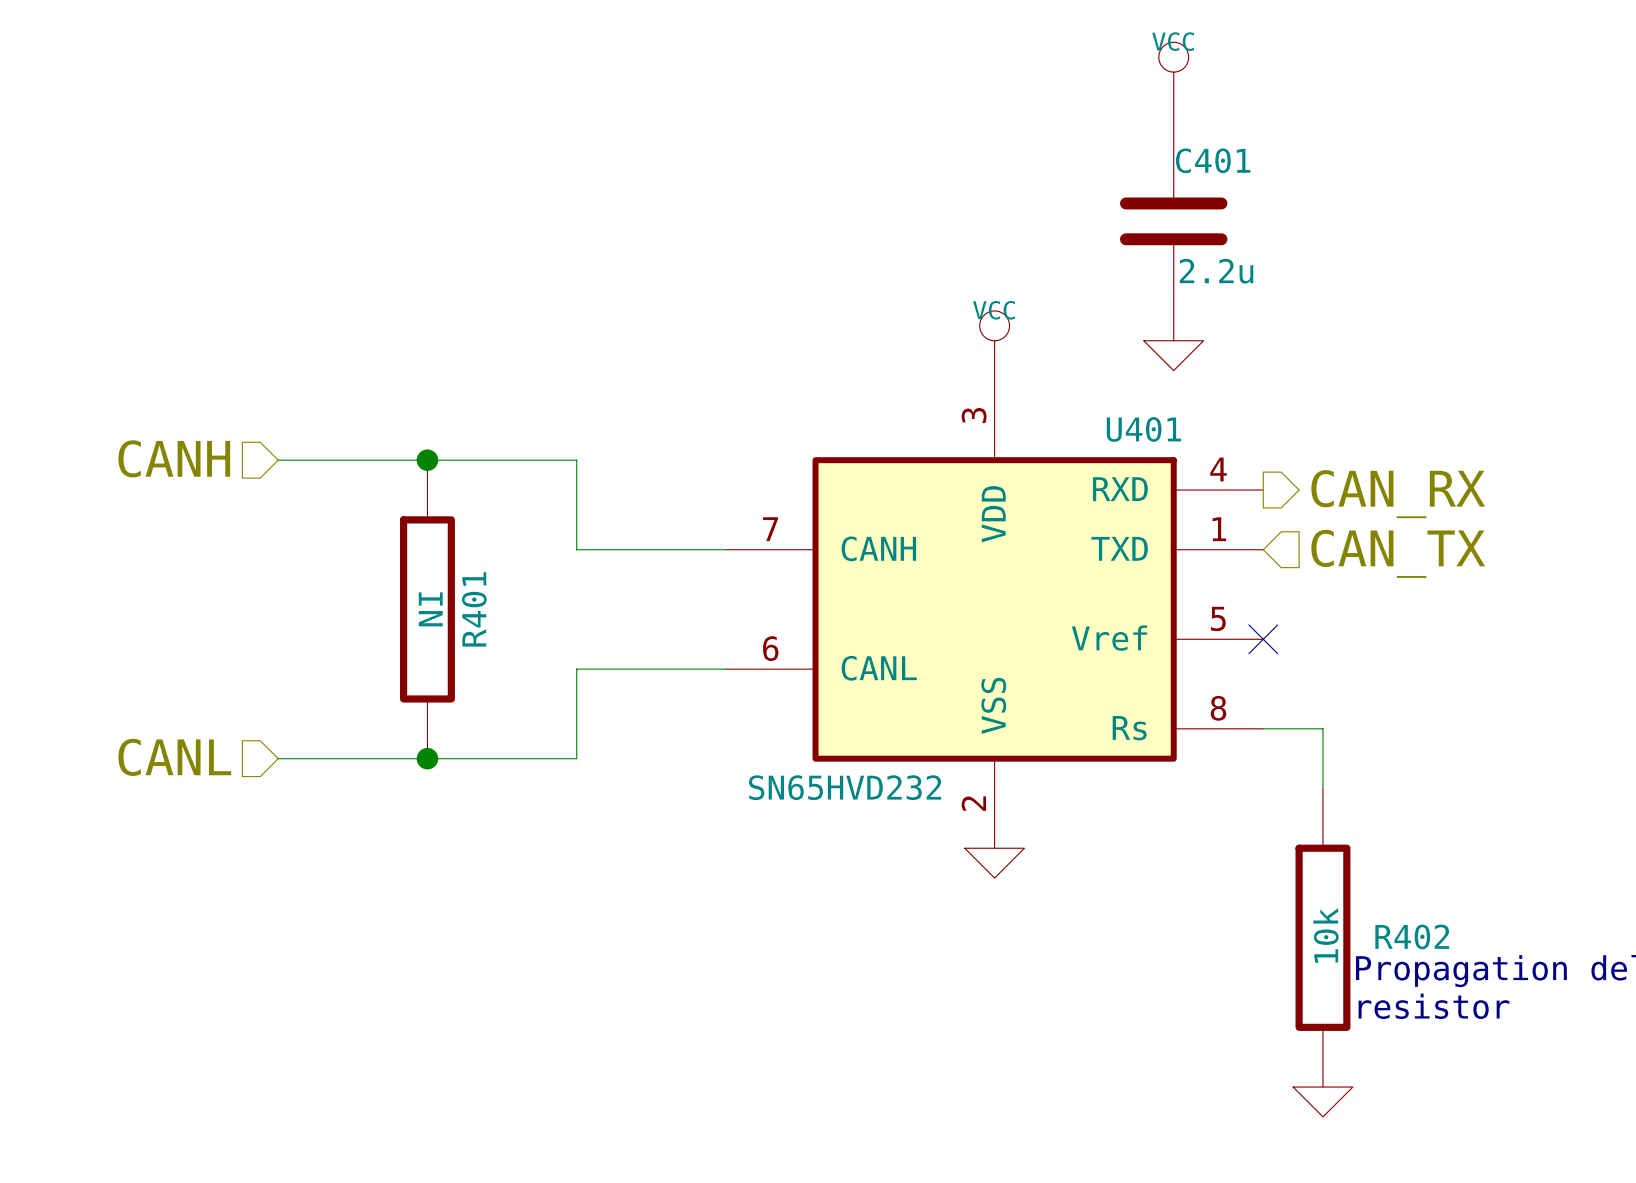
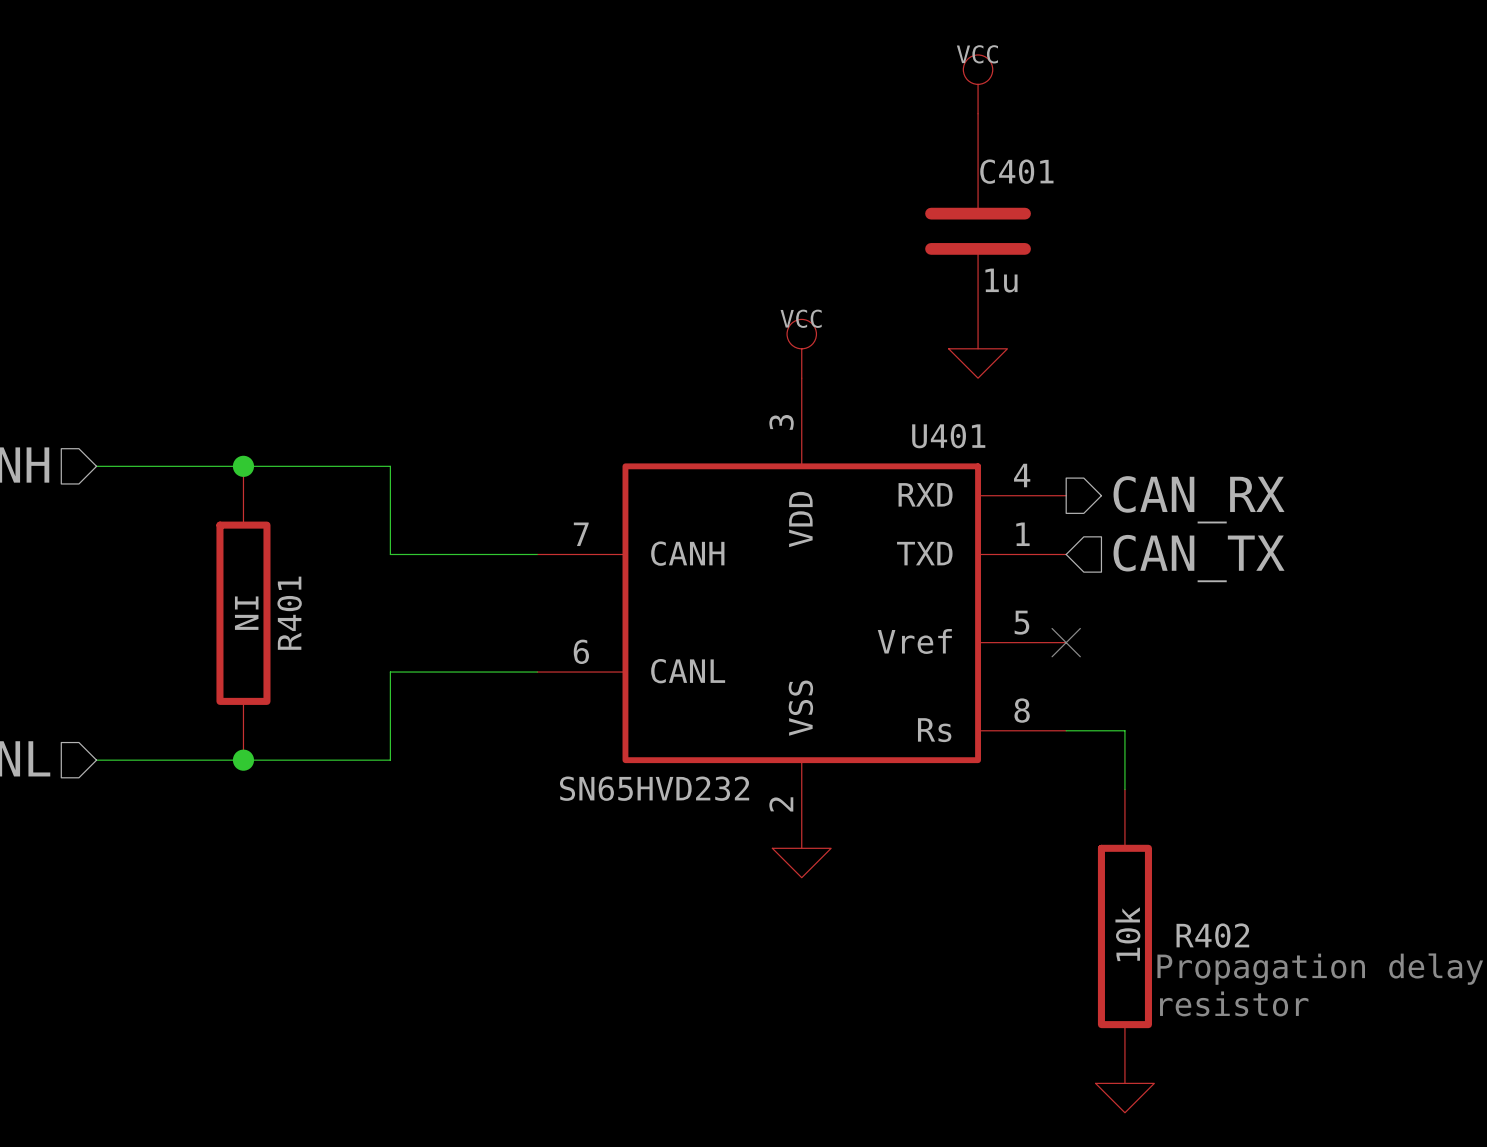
C401 value: 2.2u (1216, 271) -> 1u (1001, 280)

